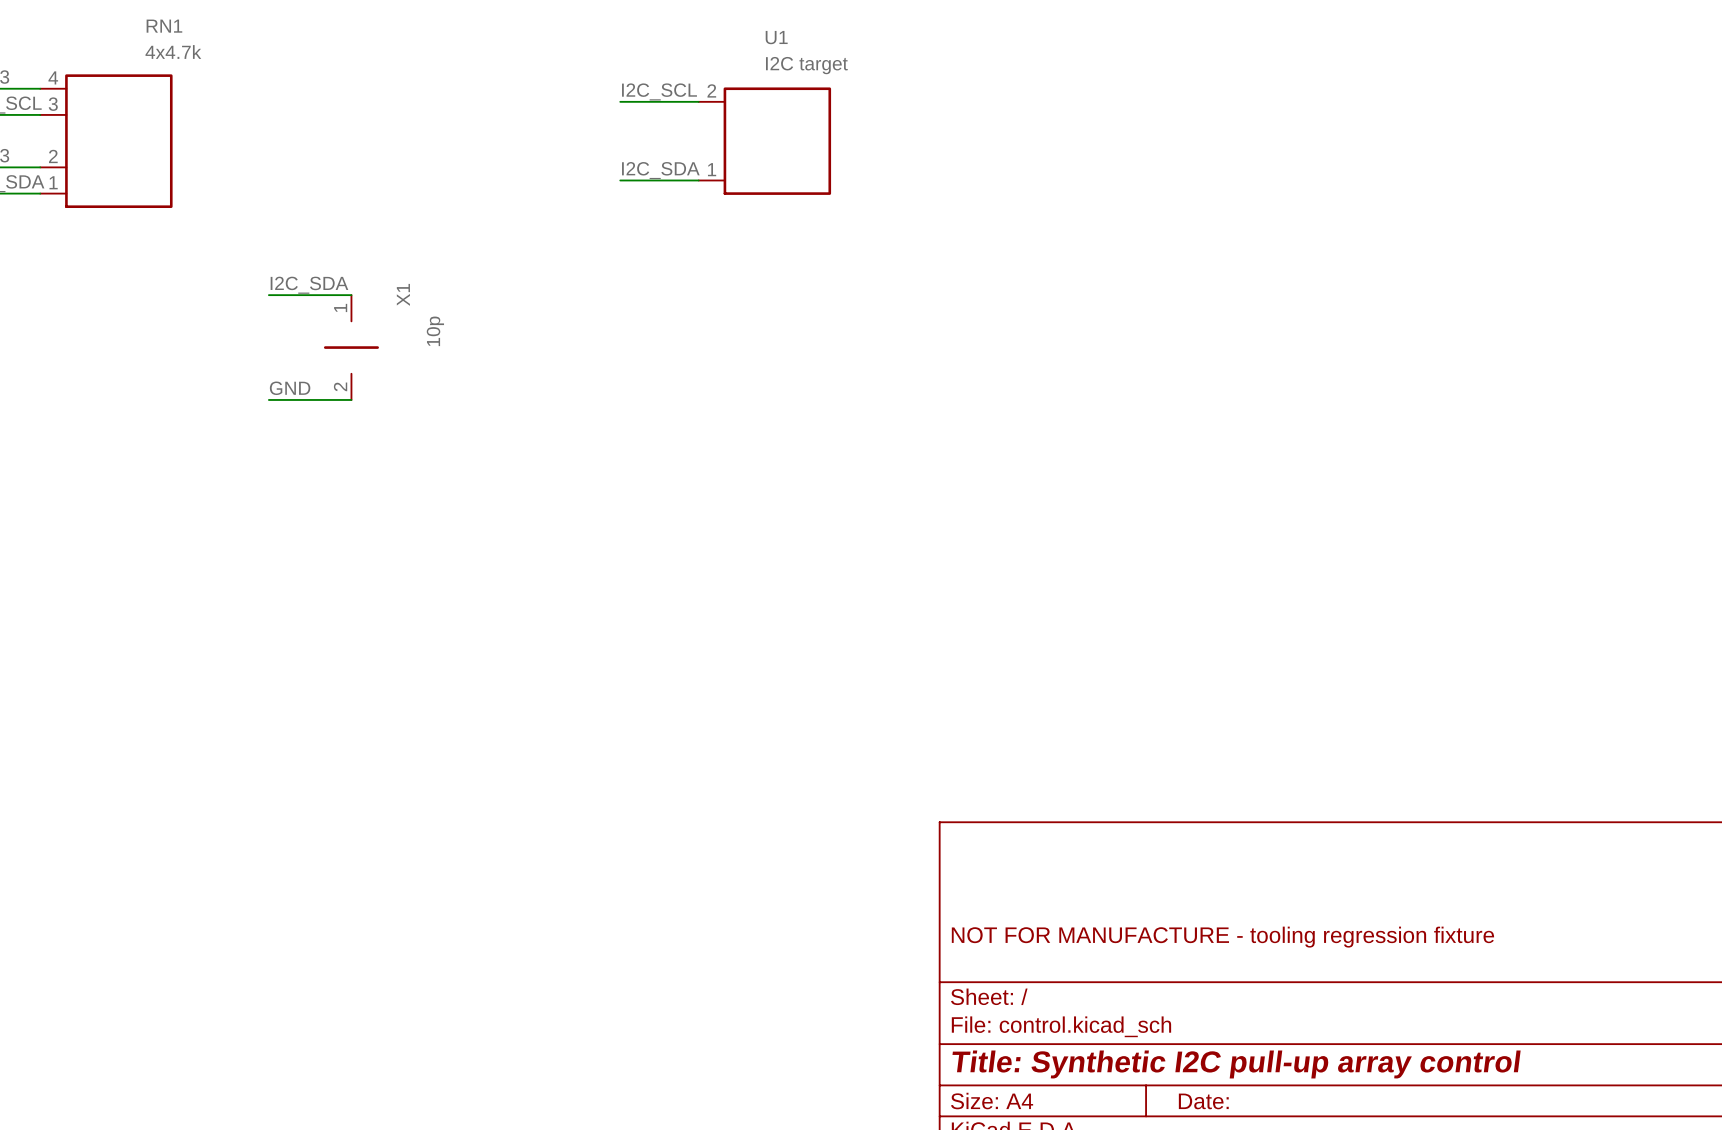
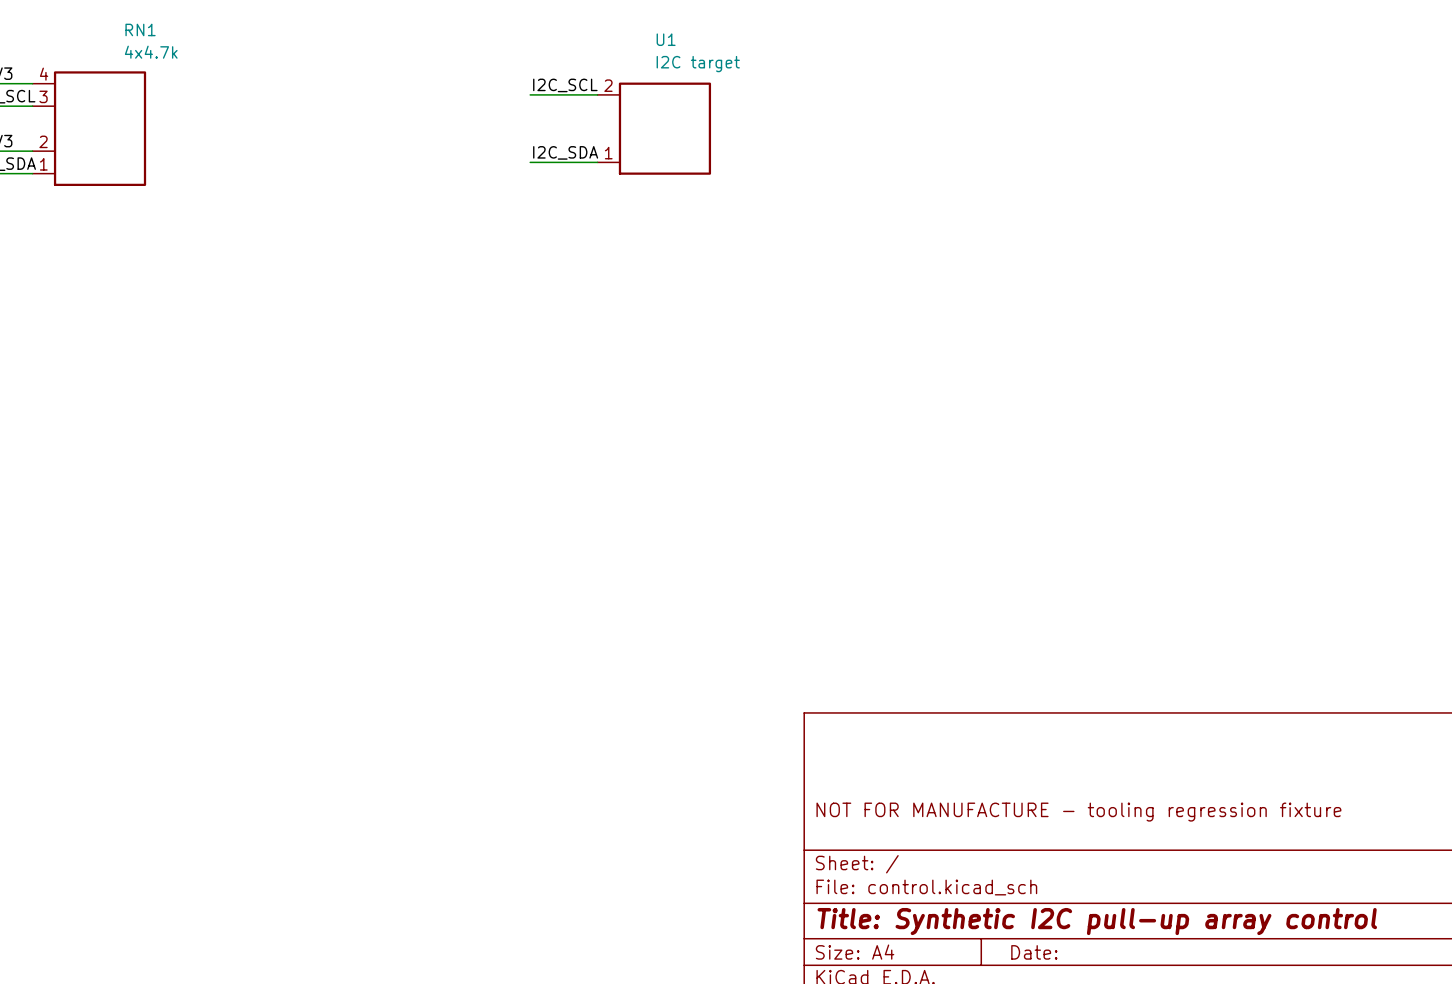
label: I2C_SDA (309, 285) -> none
wire: (268, 295) (351, 295) -> none
X1: 10p (351, 347) -> none
label: GND (290, 388) -> none
wire: (268, 399) (351, 399) -> none

